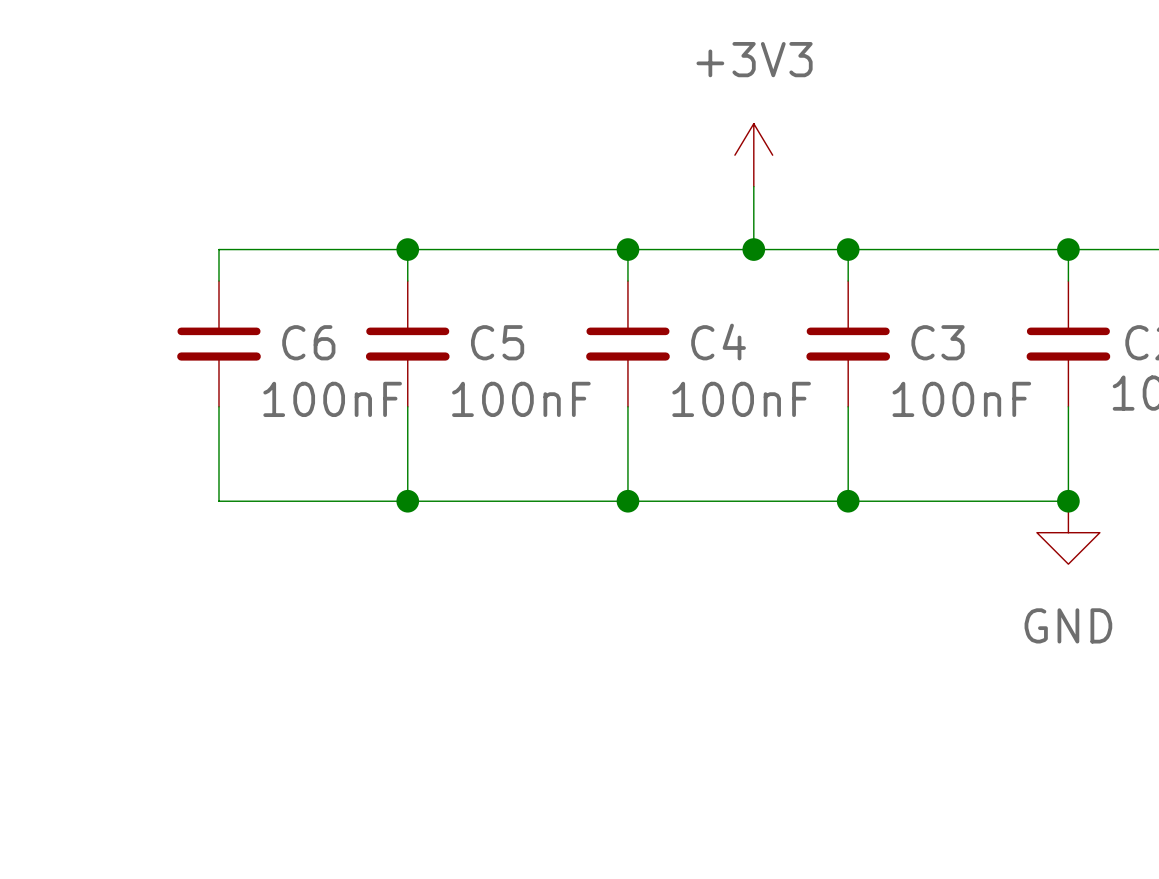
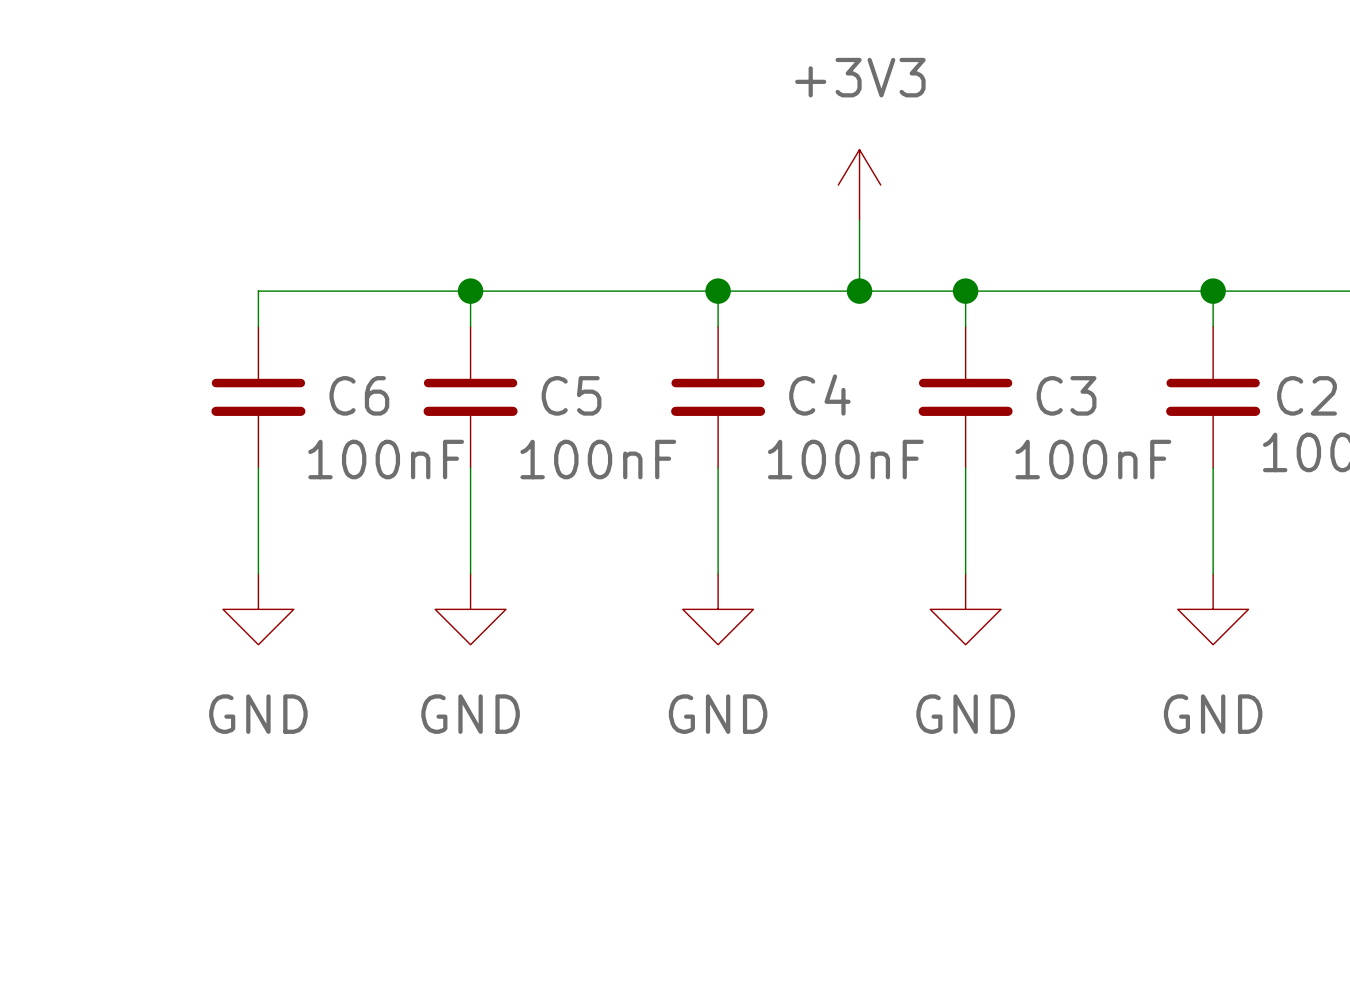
wire: (219, 501) (1068, 501) -> none
junction: (407, 501) -> none
junction: (627, 501) -> none
junction: (848, 501) -> none
junction: (1068, 501) -> none
power symbol: none -> GND (258, 609)
power symbol: none -> GND (470, 609)
power symbol: none -> GND (718, 609)
power symbol: none -> GND (965, 609)

